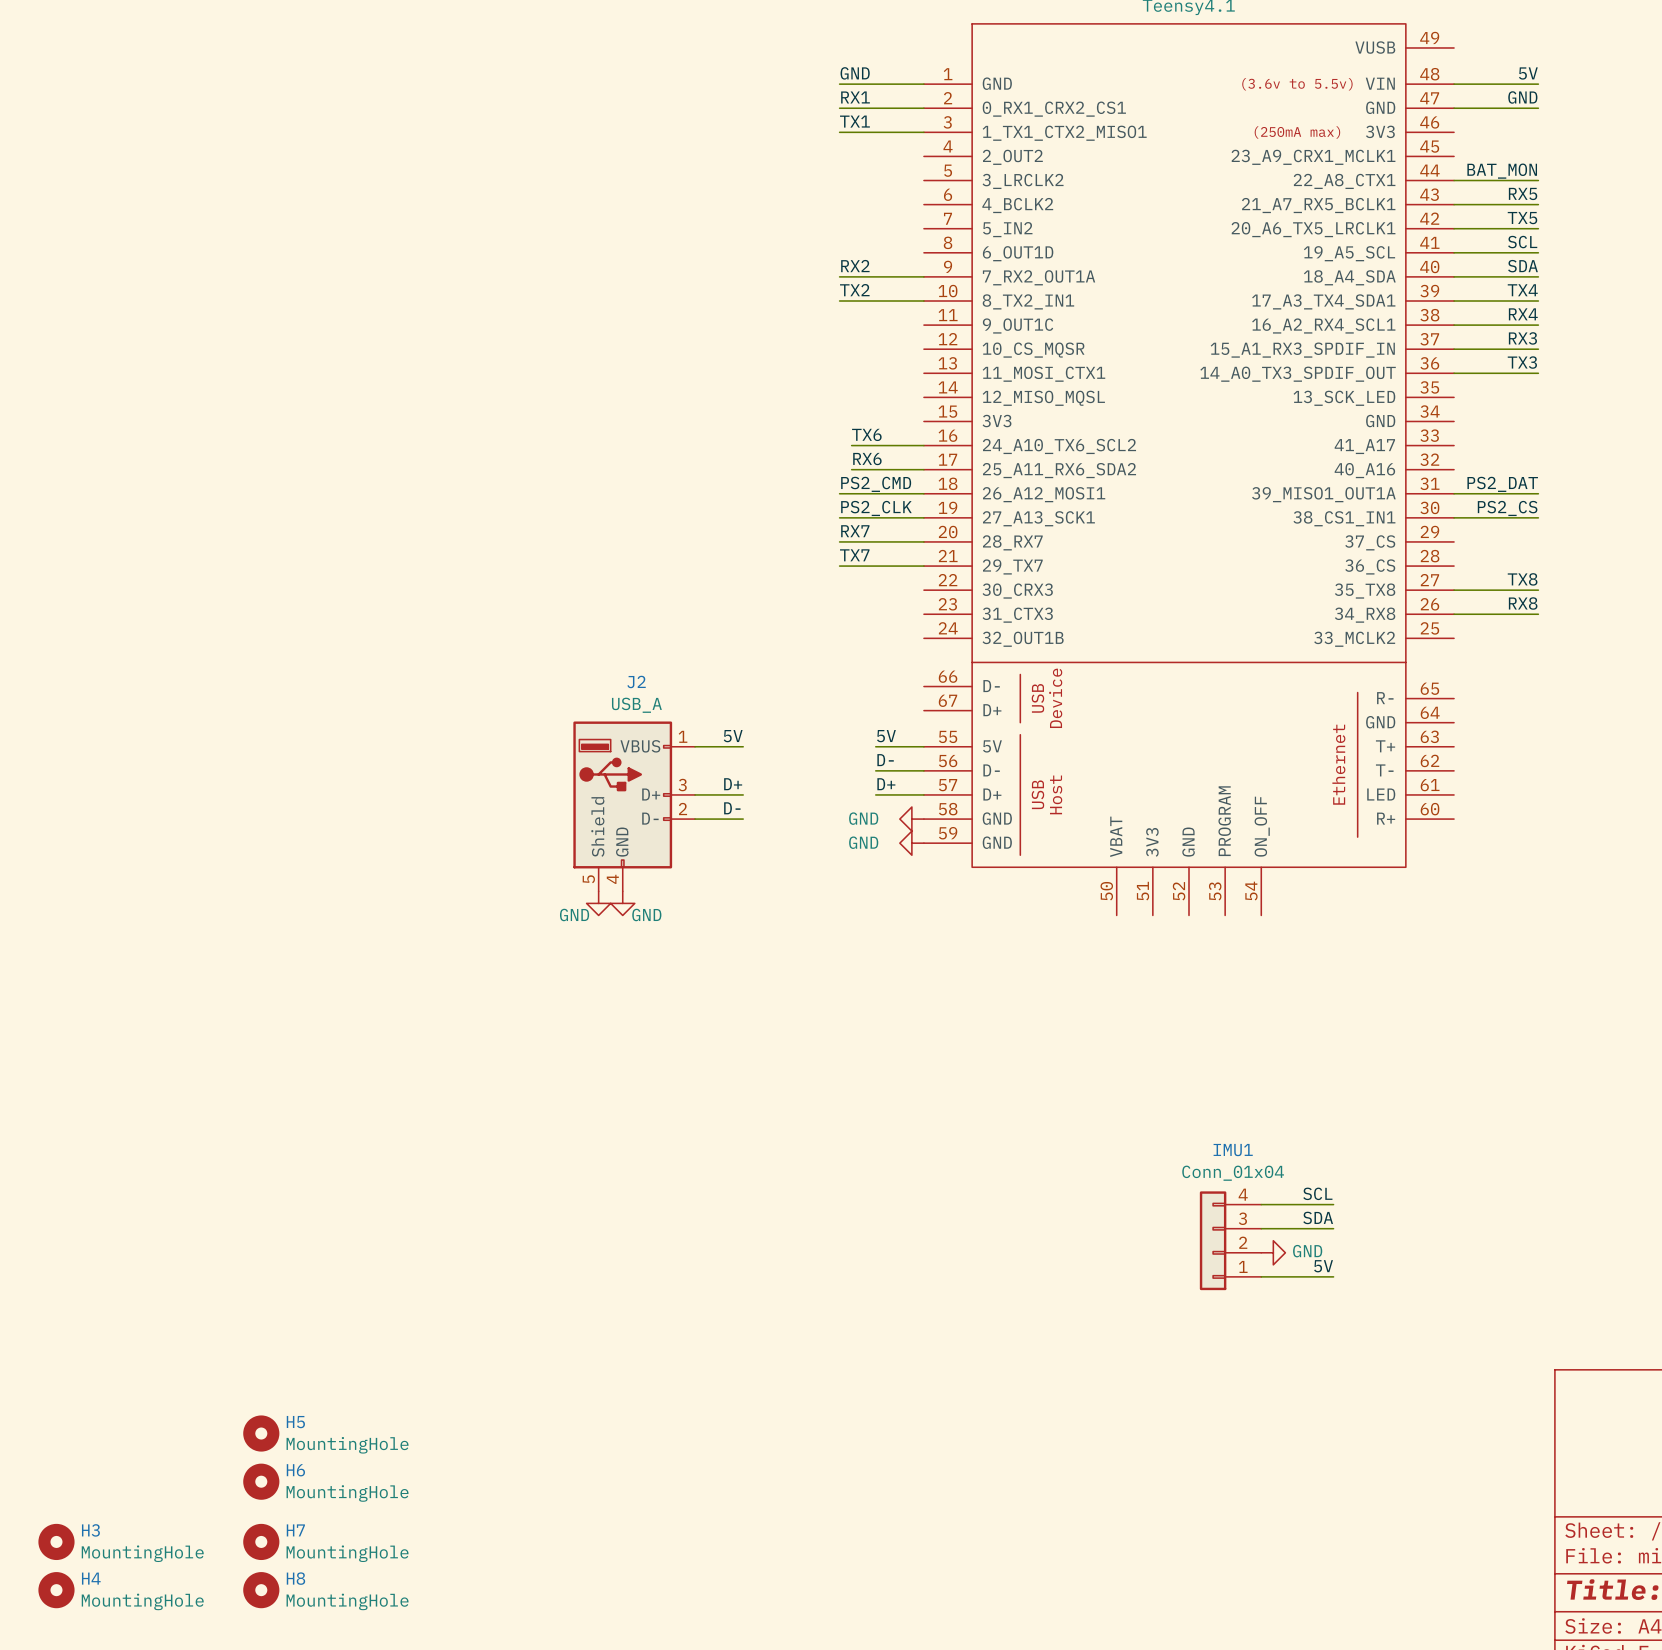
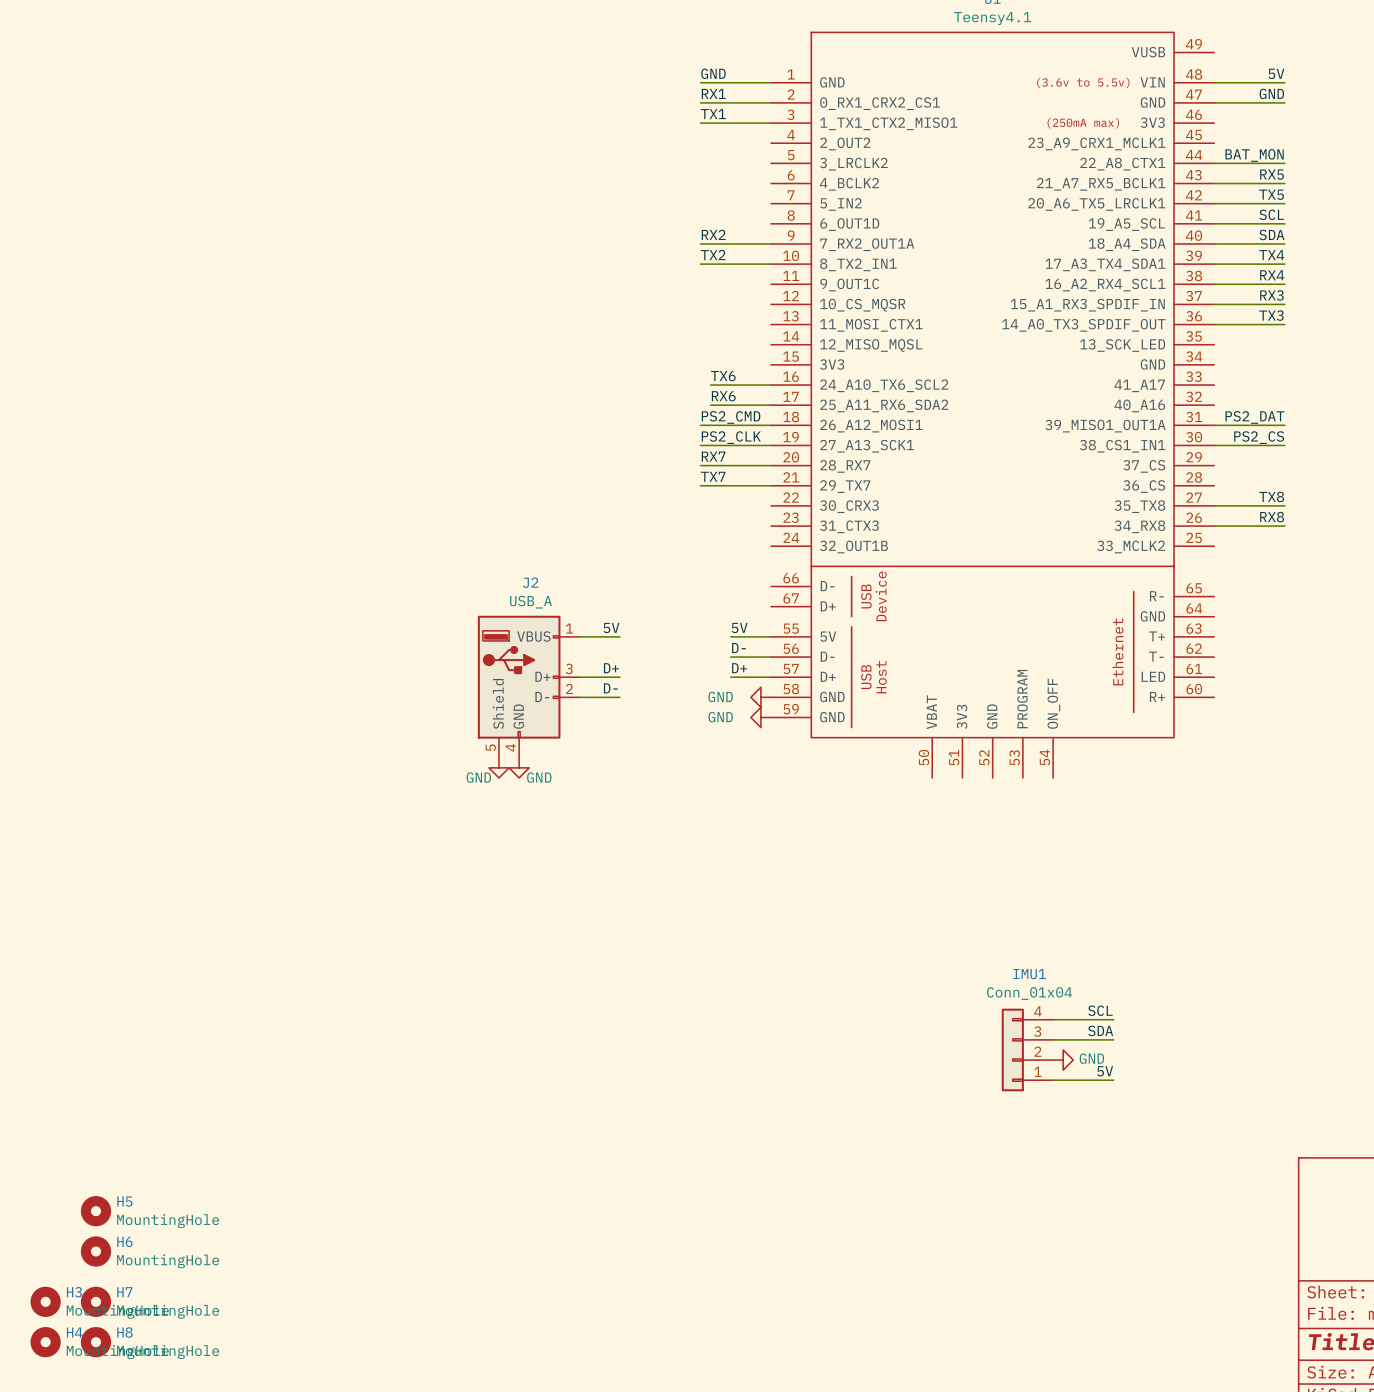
H5 position: (261, 1433) -> (95, 1211)
H6 position: (261, 1481) -> (95, 1251)
H7 position: (261, 1541) -> (95, 1301)
H8 position: (261, 1590) -> (95, 1342)

